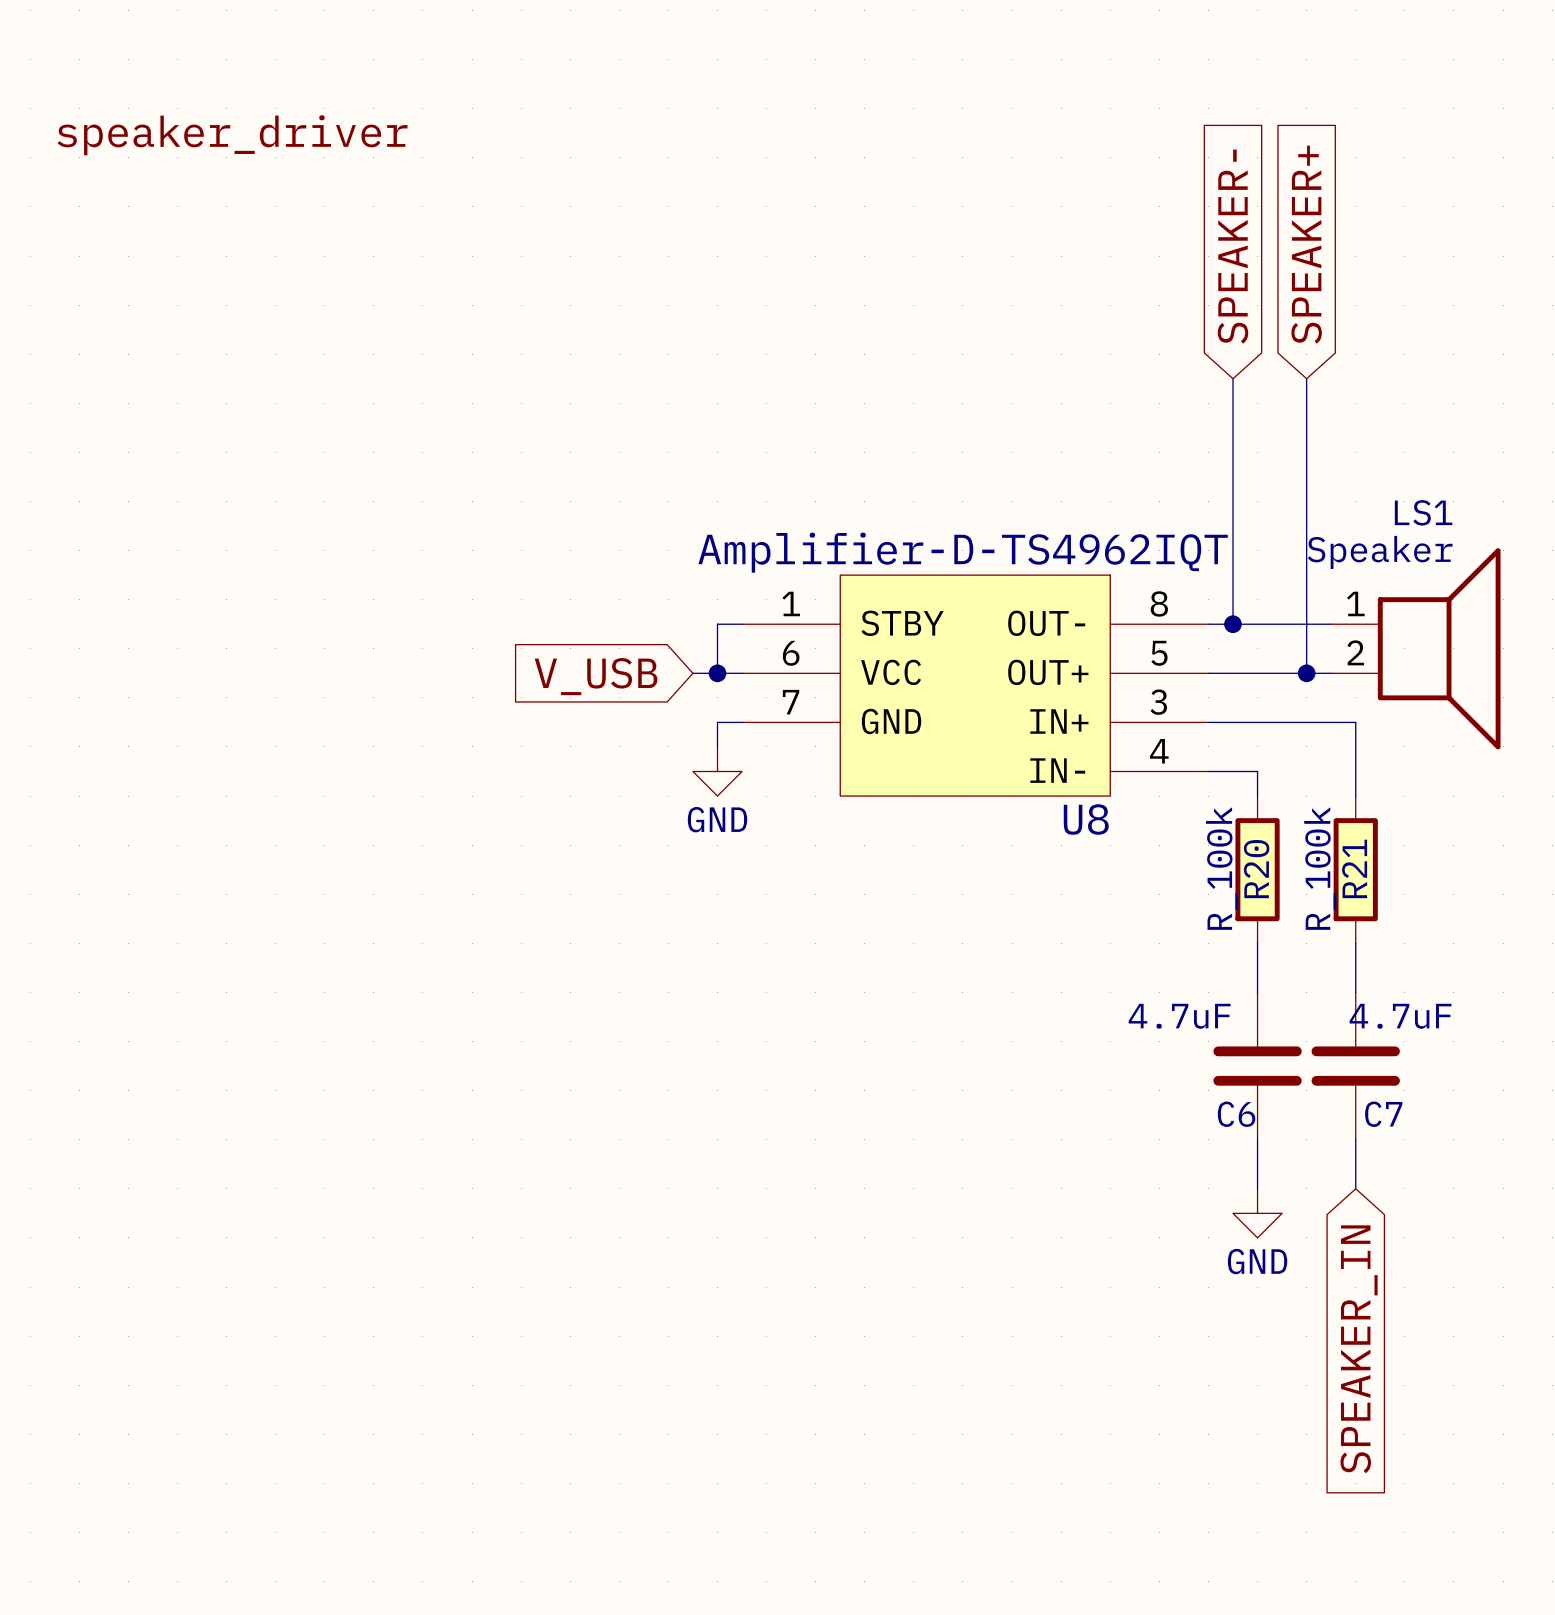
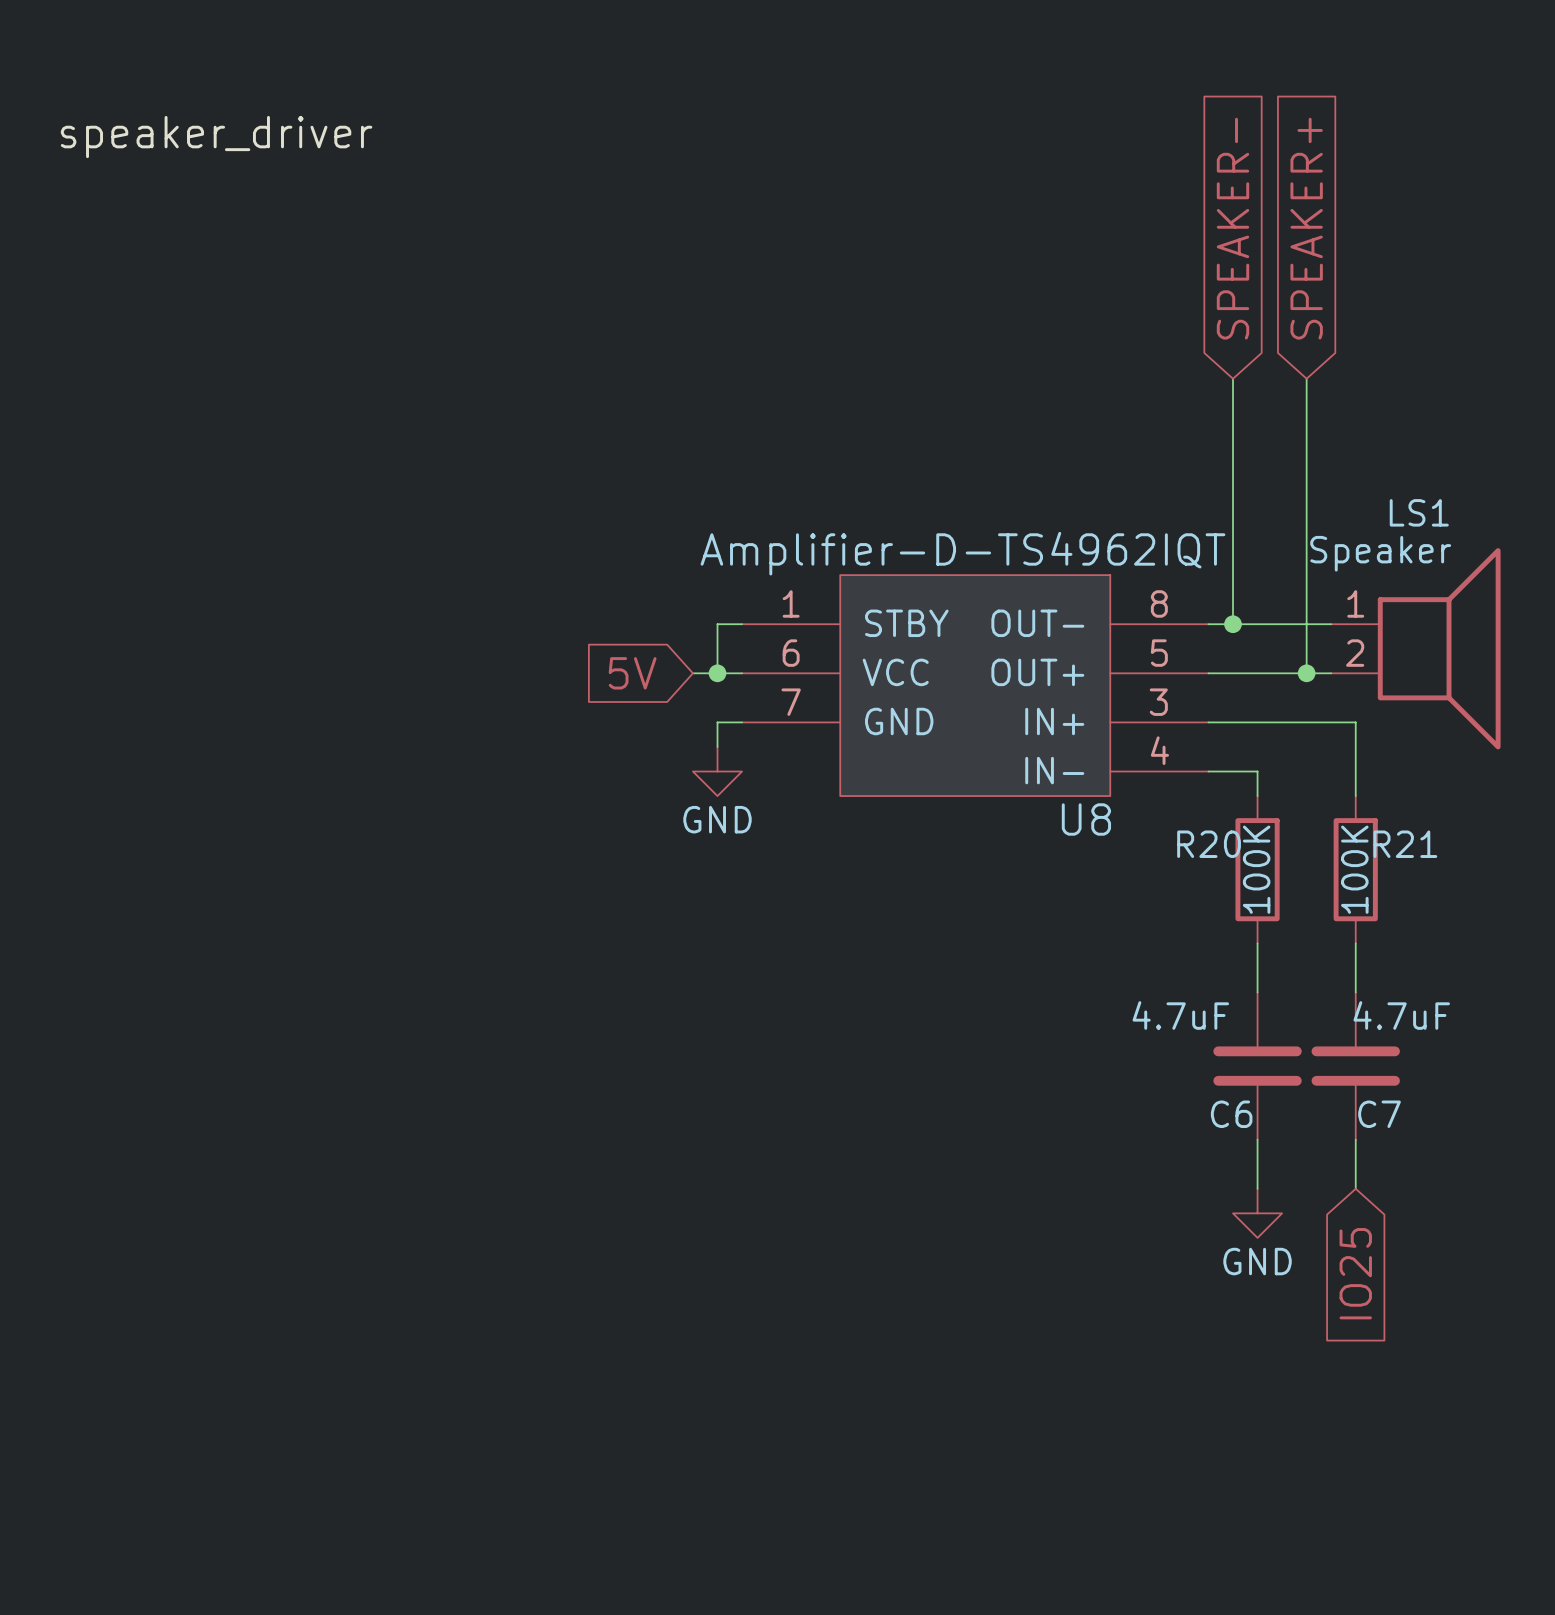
global label: V_USB (596, 676) -> 5V (632, 673)
R20 symbol: [1235, 796, 1280, 944] -> [1235, 796, 1280, 944]
R21 symbol: [1333, 796, 1378, 944] -> [1333, 796, 1378, 944]
R20 value: R_100k (1222, 868) -> 100K (1256, 869)
R21 value: R_100k (1320, 868) -> 100K (1354, 869)
R21 name position: R21 (1354, 868) -> R21 (1405, 844)
R20 name position: R20 (1256, 869) -> R20 (1209, 844)
global label: SPEAKER_IN (1359, 1349) -> IO25 (1355, 1273)

